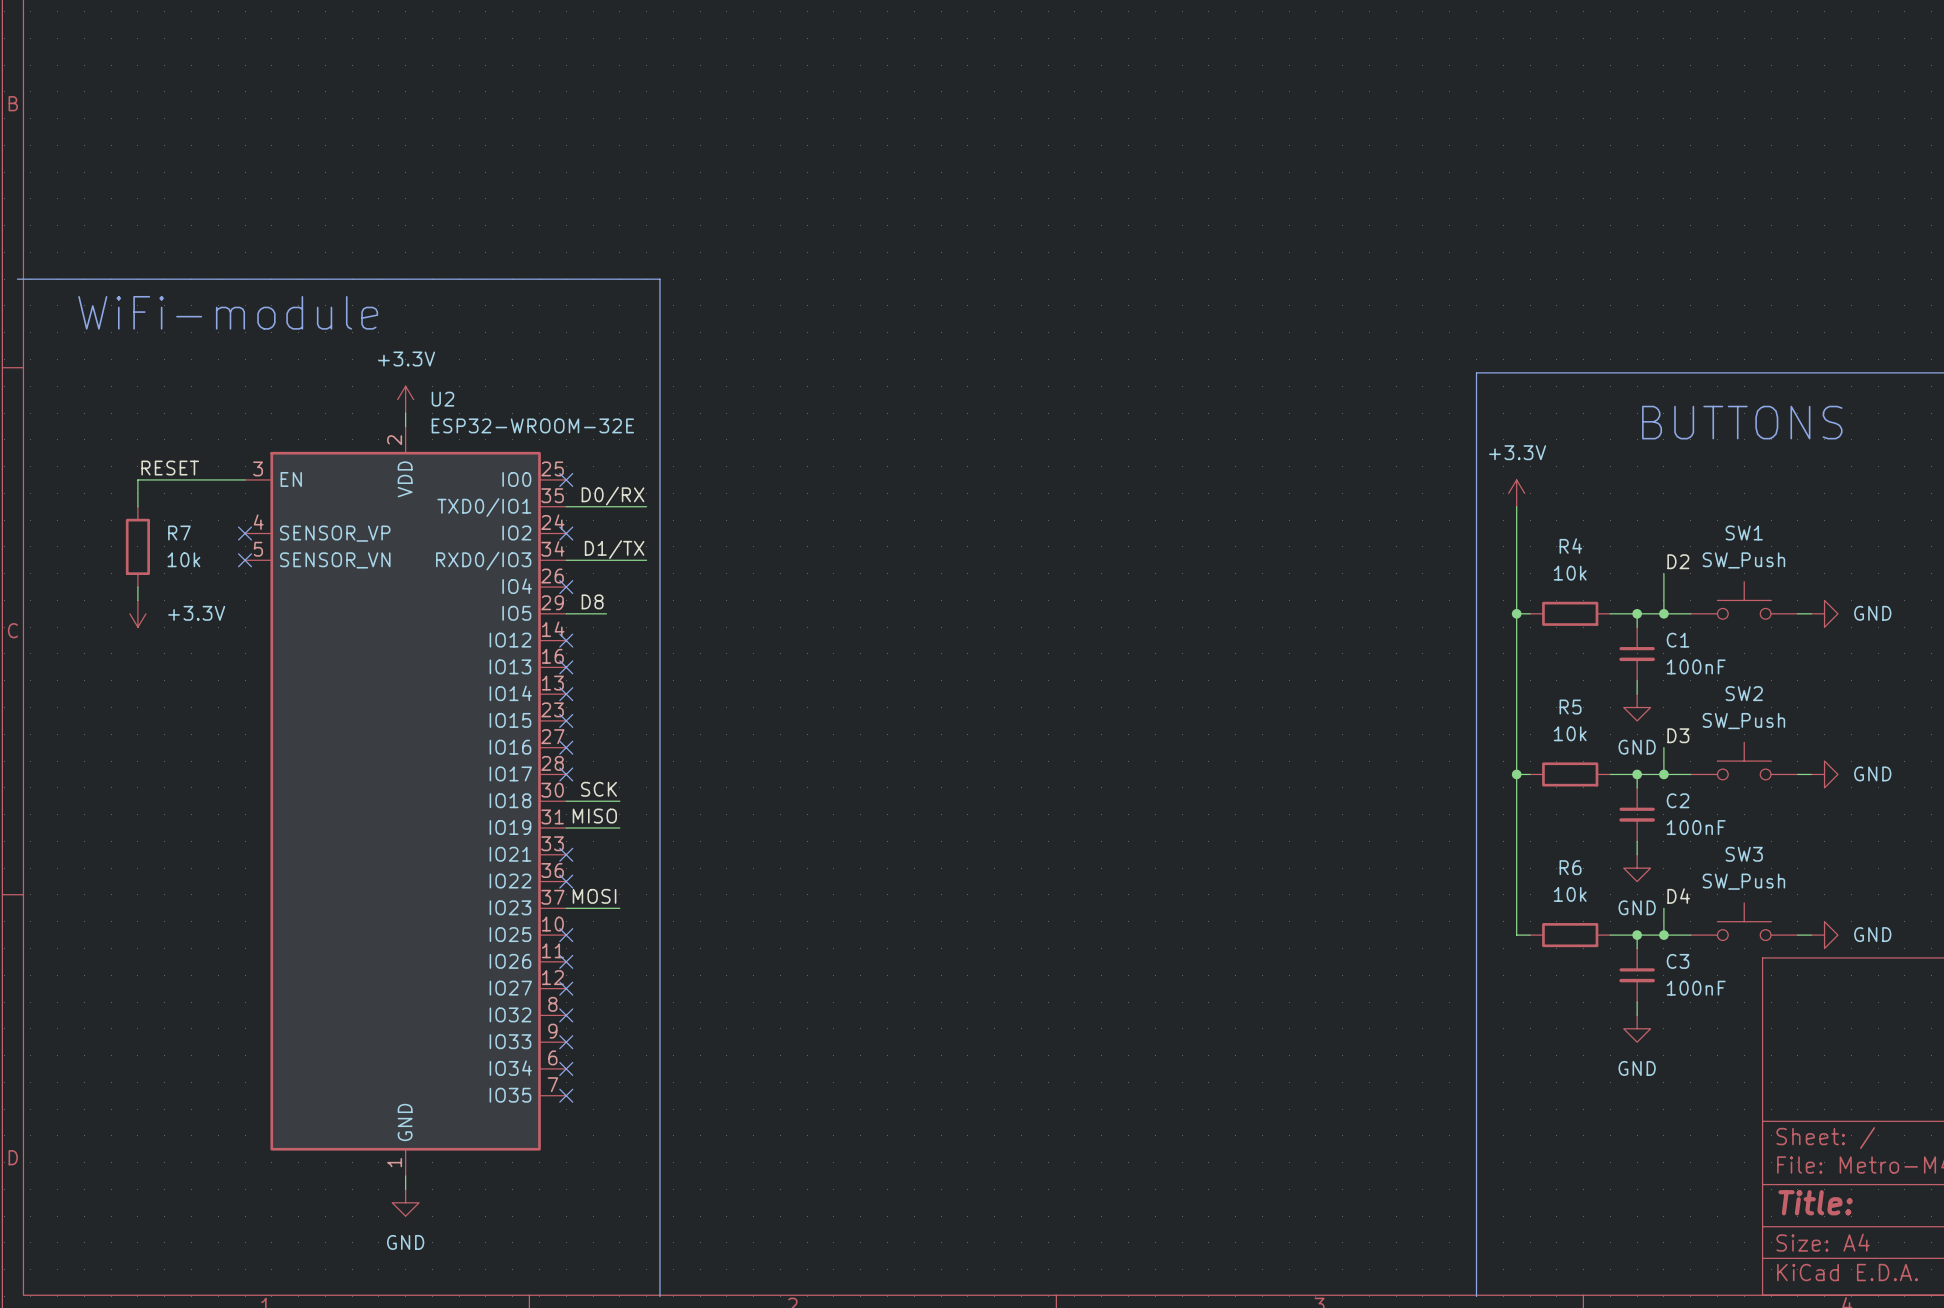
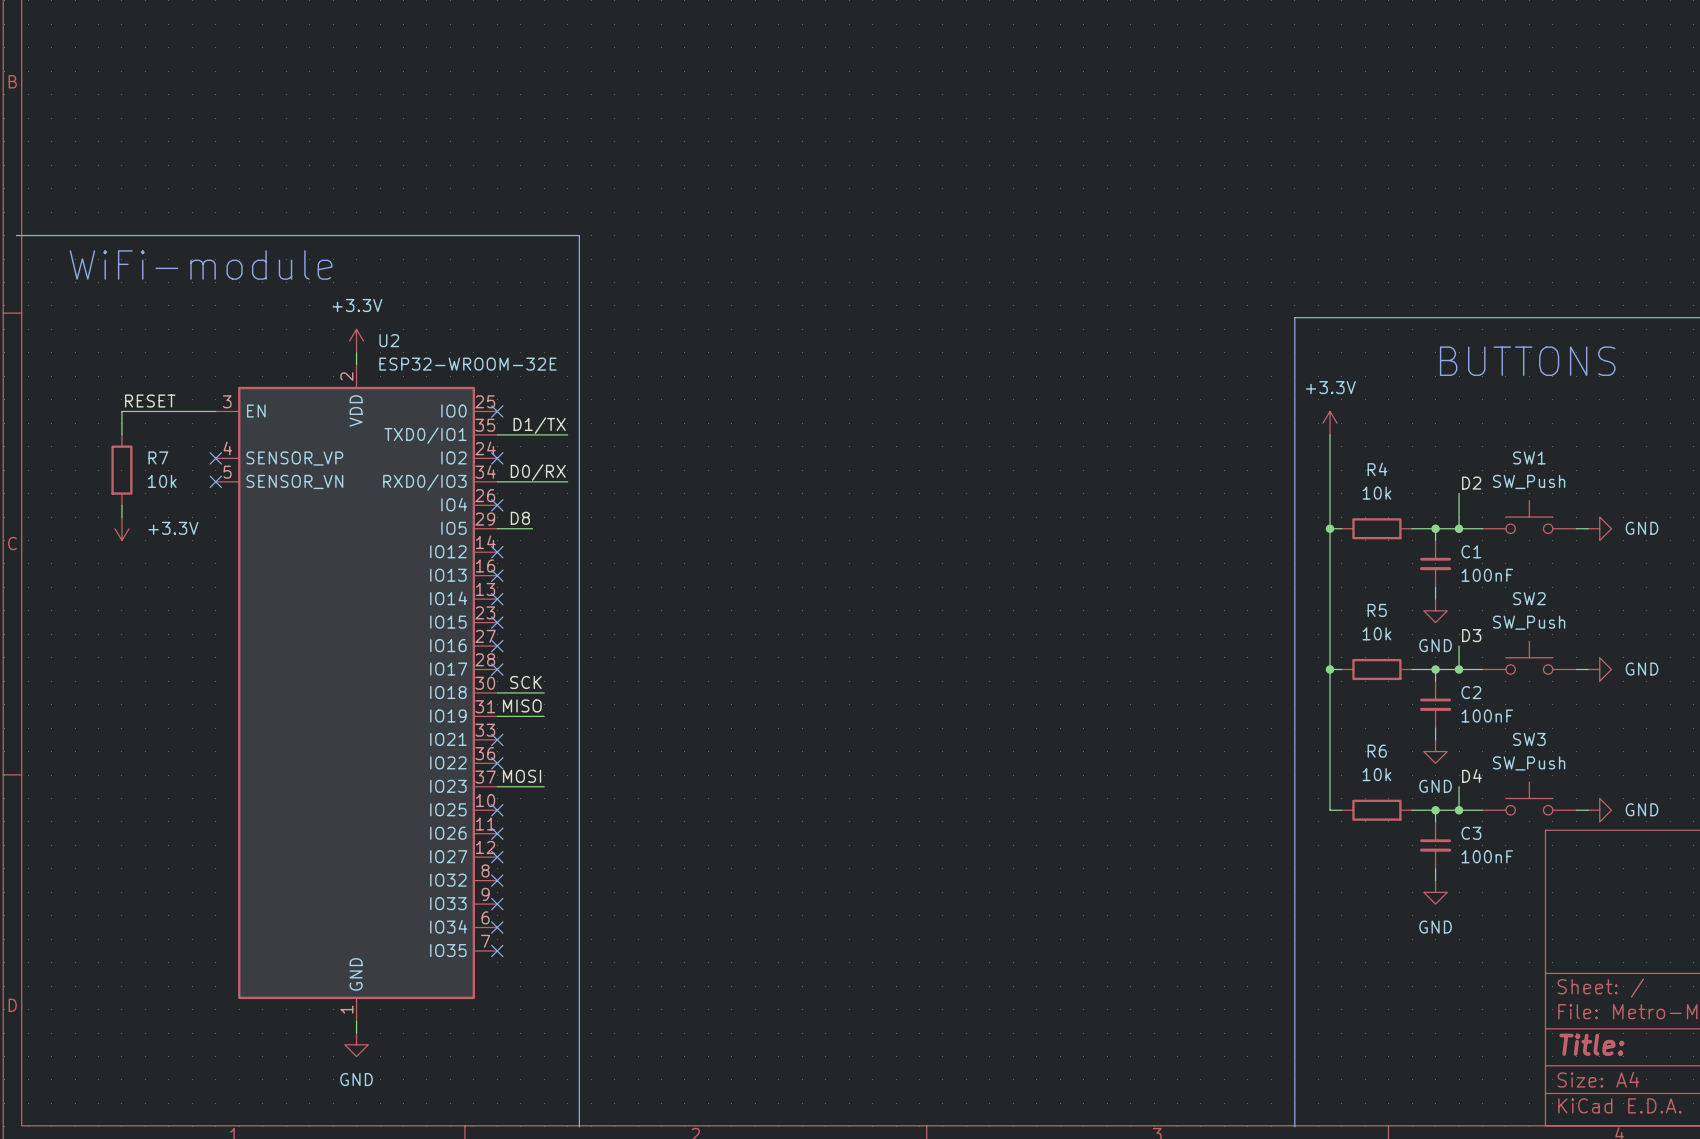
label: D0/RX (613, 496) -> D1/TX (539, 425)
label: D1/TX (614, 549) -> D0/RX (538, 472)

